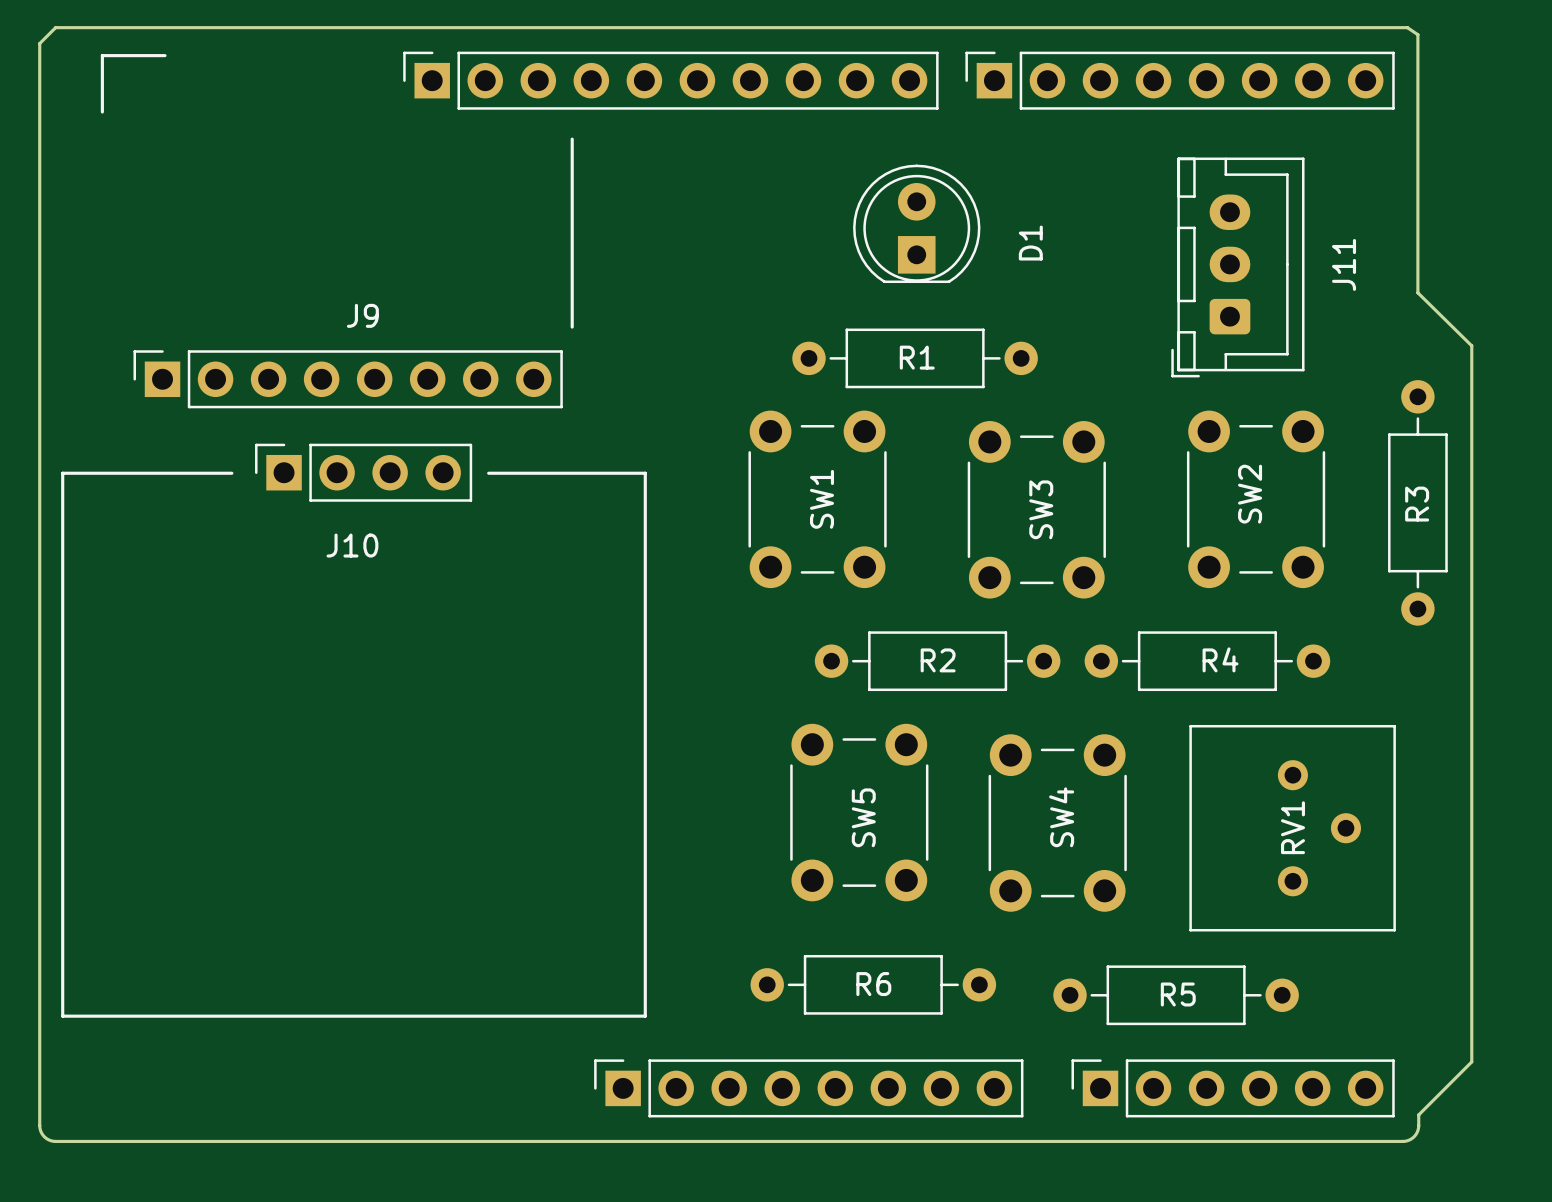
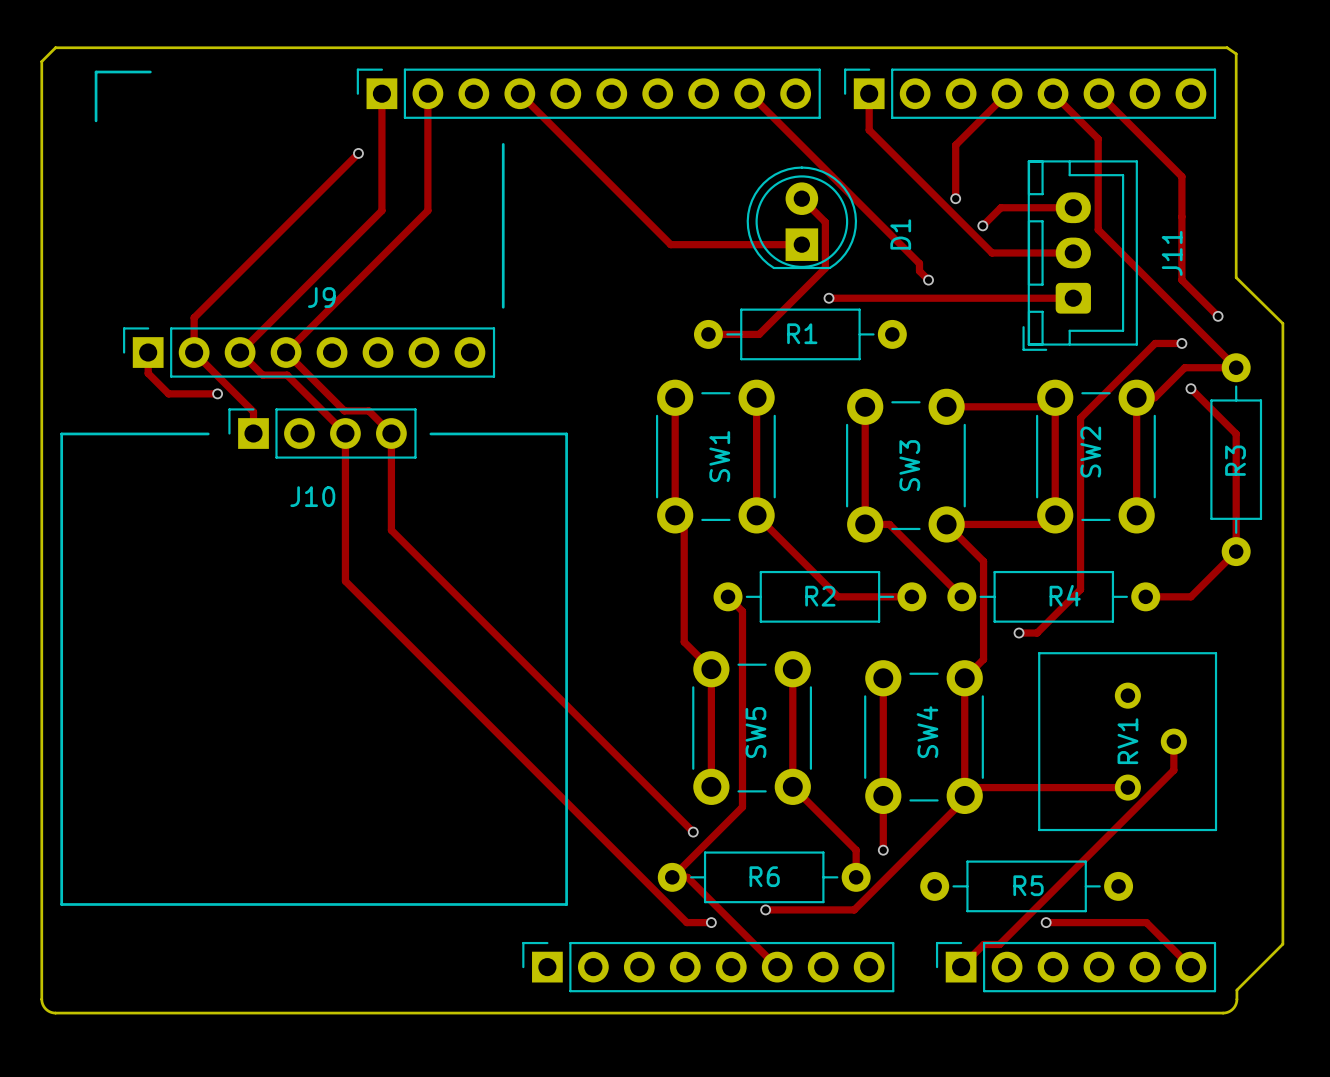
track: none -> (381, 93) (381, 210) (240, 352) (262, 375) (287, 375) (345, 433) (345, 581) (686, 922) (711, 922)
track: none -> (427, 93) (427, 210) (286, 352) (344, 410) (368, 410) (391, 433) (391, 530) (693, 832)
track: none -> (519, 93) (670, 244) (801, 244)
track: none -> (749, 93) (919, 263) (919, 271) (928, 280)
track: none -> (869, 93) (869, 130) (992, 252) (1073, 252)
track: none -> (1007, 93) (955, 145) (955, 198)
track: none -> (1053, 93) (1098, 138) (1098, 229) (1236, 367) (1184, 367) (1154, 397) (1136, 397) (1136, 515)
track: none -> (1099, 93) (1181, 176) (1181, 280) (1218, 316)
track: none -> (358, 153) (194, 317) (194, 352) (253, 411) (253, 433)
via: none -> (358, 153)
track: none -> (801, 198) (825, 222) (825, 268) (759, 334) (708, 334)
via: none -> (955, 198)
track: none -> (1073, 207) (1000, 207) (982, 225)
via: none -> (982, 225)
via: none -> (928, 280)
track: none -> (829, 298) (1073, 298)
via: none -> (829, 298)
via: none -> (1218, 316)
track: none -> (1181, 343) (1155, 343) (1080, 418) (1080, 589) (1037, 633) (1019, 633)
via: none -> (1181, 343)
track: none -> (148, 352) (148, 373) (168, 393) (217, 393)
track: none -> (1190, 388) (1236, 433) (1236, 551) (1190, 596) (1145, 596)
via: none -> (1190, 388)
via: none -> (217, 393)
track: none -> (675, 397) (675, 515) (684, 524) (684, 642) (711, 669) (711, 786)
track: none -> (756, 397) (756, 515) (838, 596) (911, 596)
track: none -> (865, 406) (865, 524) (889, 524) (961, 596)
track: none -> (946, 406) (1046, 406) (1055, 397) (1055, 515) (1046, 524) (946, 524) (983, 561) (983, 659) (964, 678) (964, 799) (854, 909) (765, 909)
track: none -> (728, 596) (742, 611) (742, 807) (672, 877) (687, 877) (777, 967)
via: none -> (1019, 633)
track: none -> (792, 669) (792, 786) (856, 850) (856, 877)
track: none -> (883, 678) (883, 850)
track: none -> (1173, 741) (1173, 770) (999, 944) (983, 944) (961, 967)
track: none -> (1127, 787) (973, 787) (964, 795)
via: none -> (693, 832)
via: none -> (883, 850)
via: none -> (765, 909)
via: none -> (711, 922)
track: none -> (1046, 922) (1146, 922) (1190, 967)
via: none -> (1046, 922)

